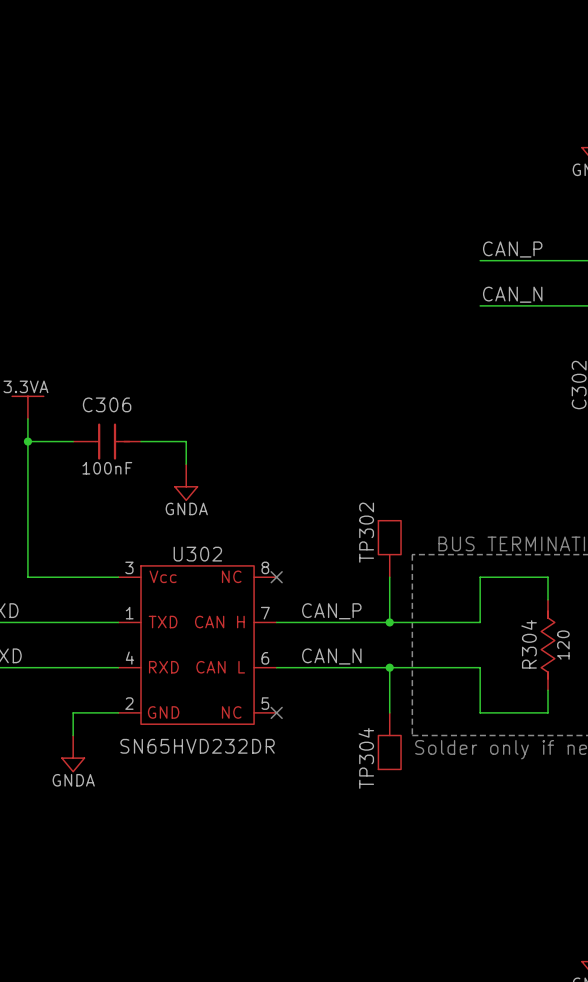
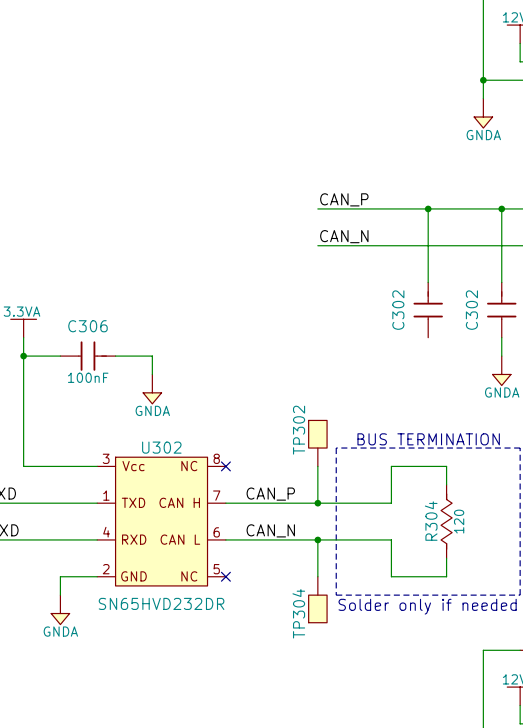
label position: CAN_P (512, 249) -> CAN_P (344, 199)
wire: none -> (317, 208) (391, 208)
wire: none -> (428, 208) (428, 282)
junction: none -> (428, 208)
label position: CAN_N (512, 294) -> CAN_N (344, 236)
wire: none -> (317, 245) (391, 245)
C302: none -> (428, 310)

